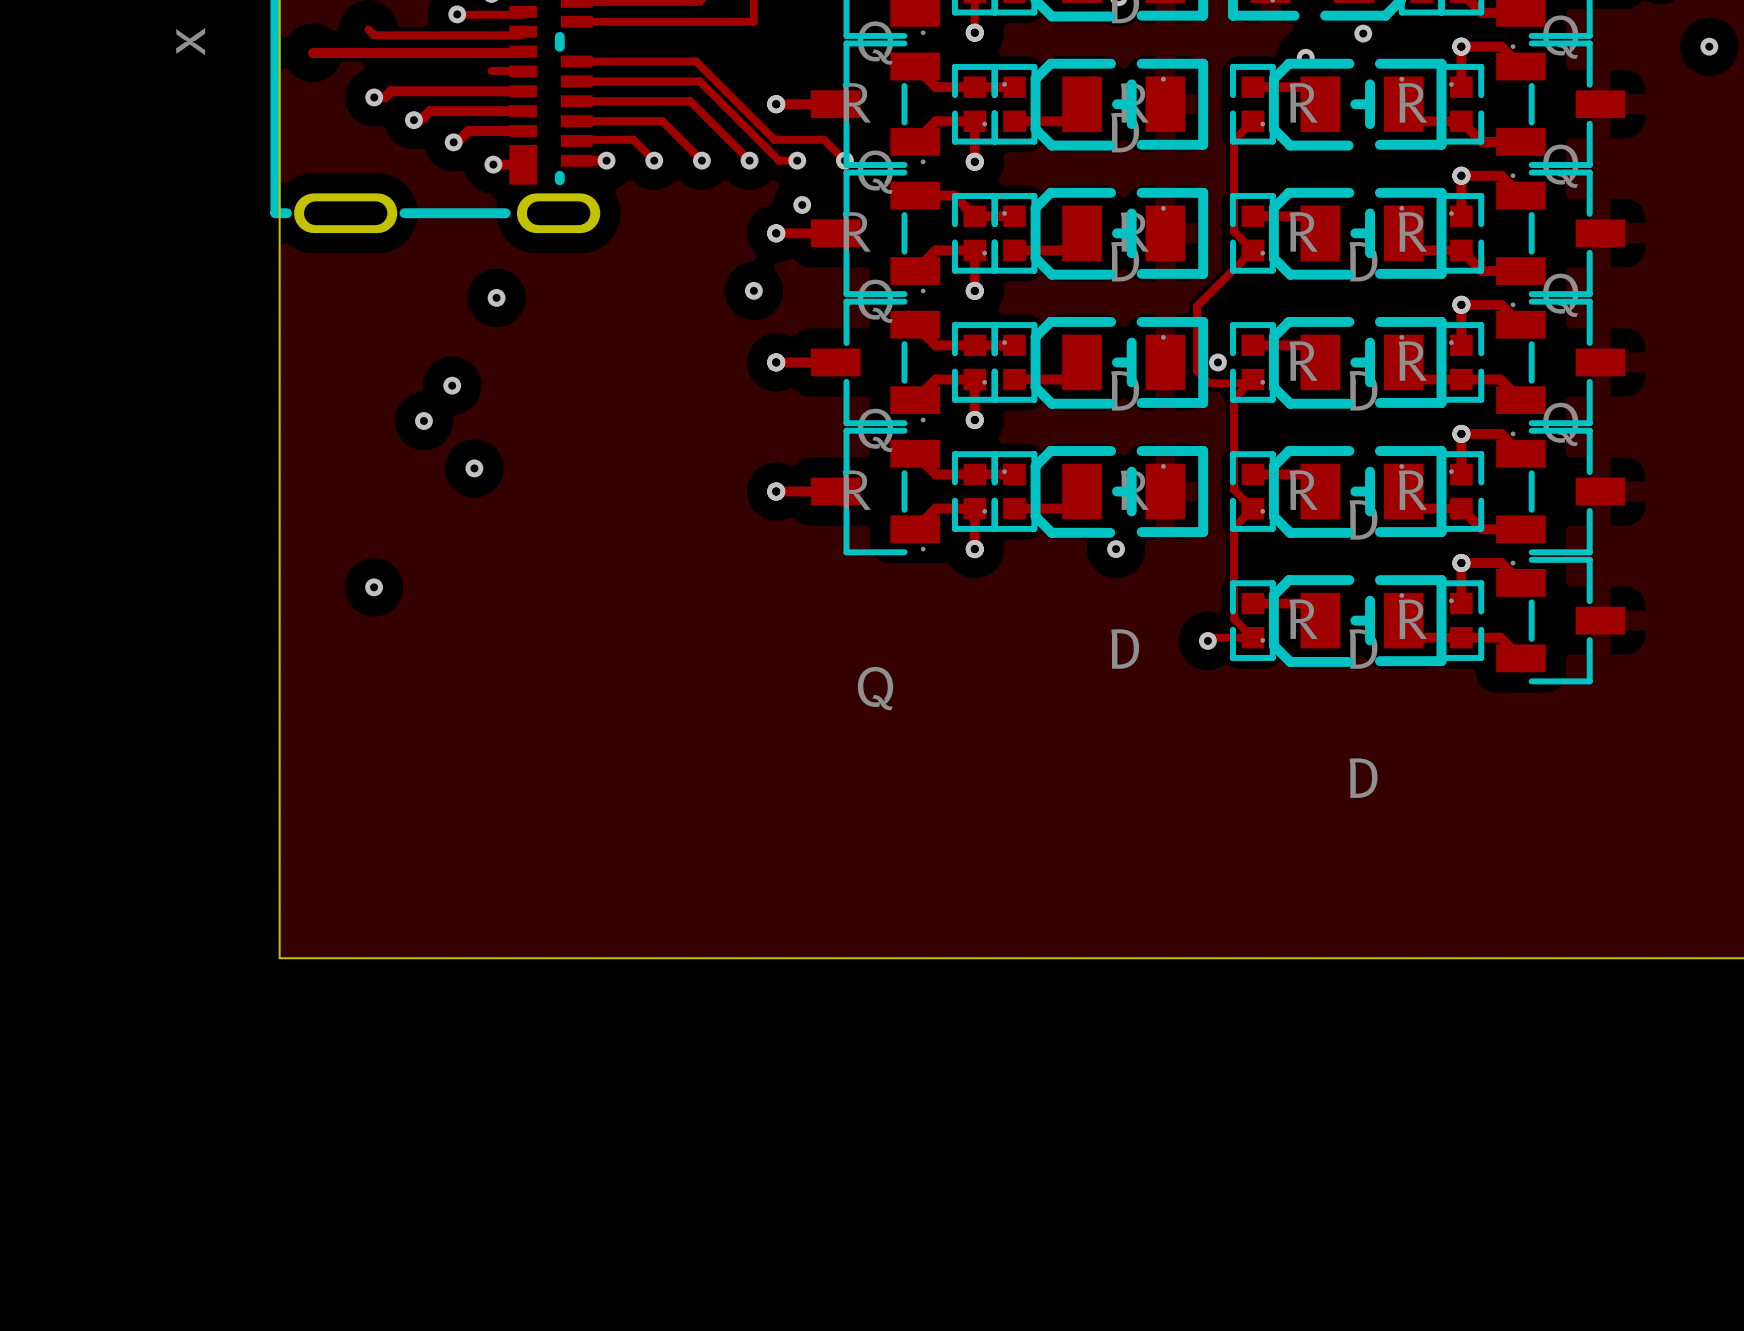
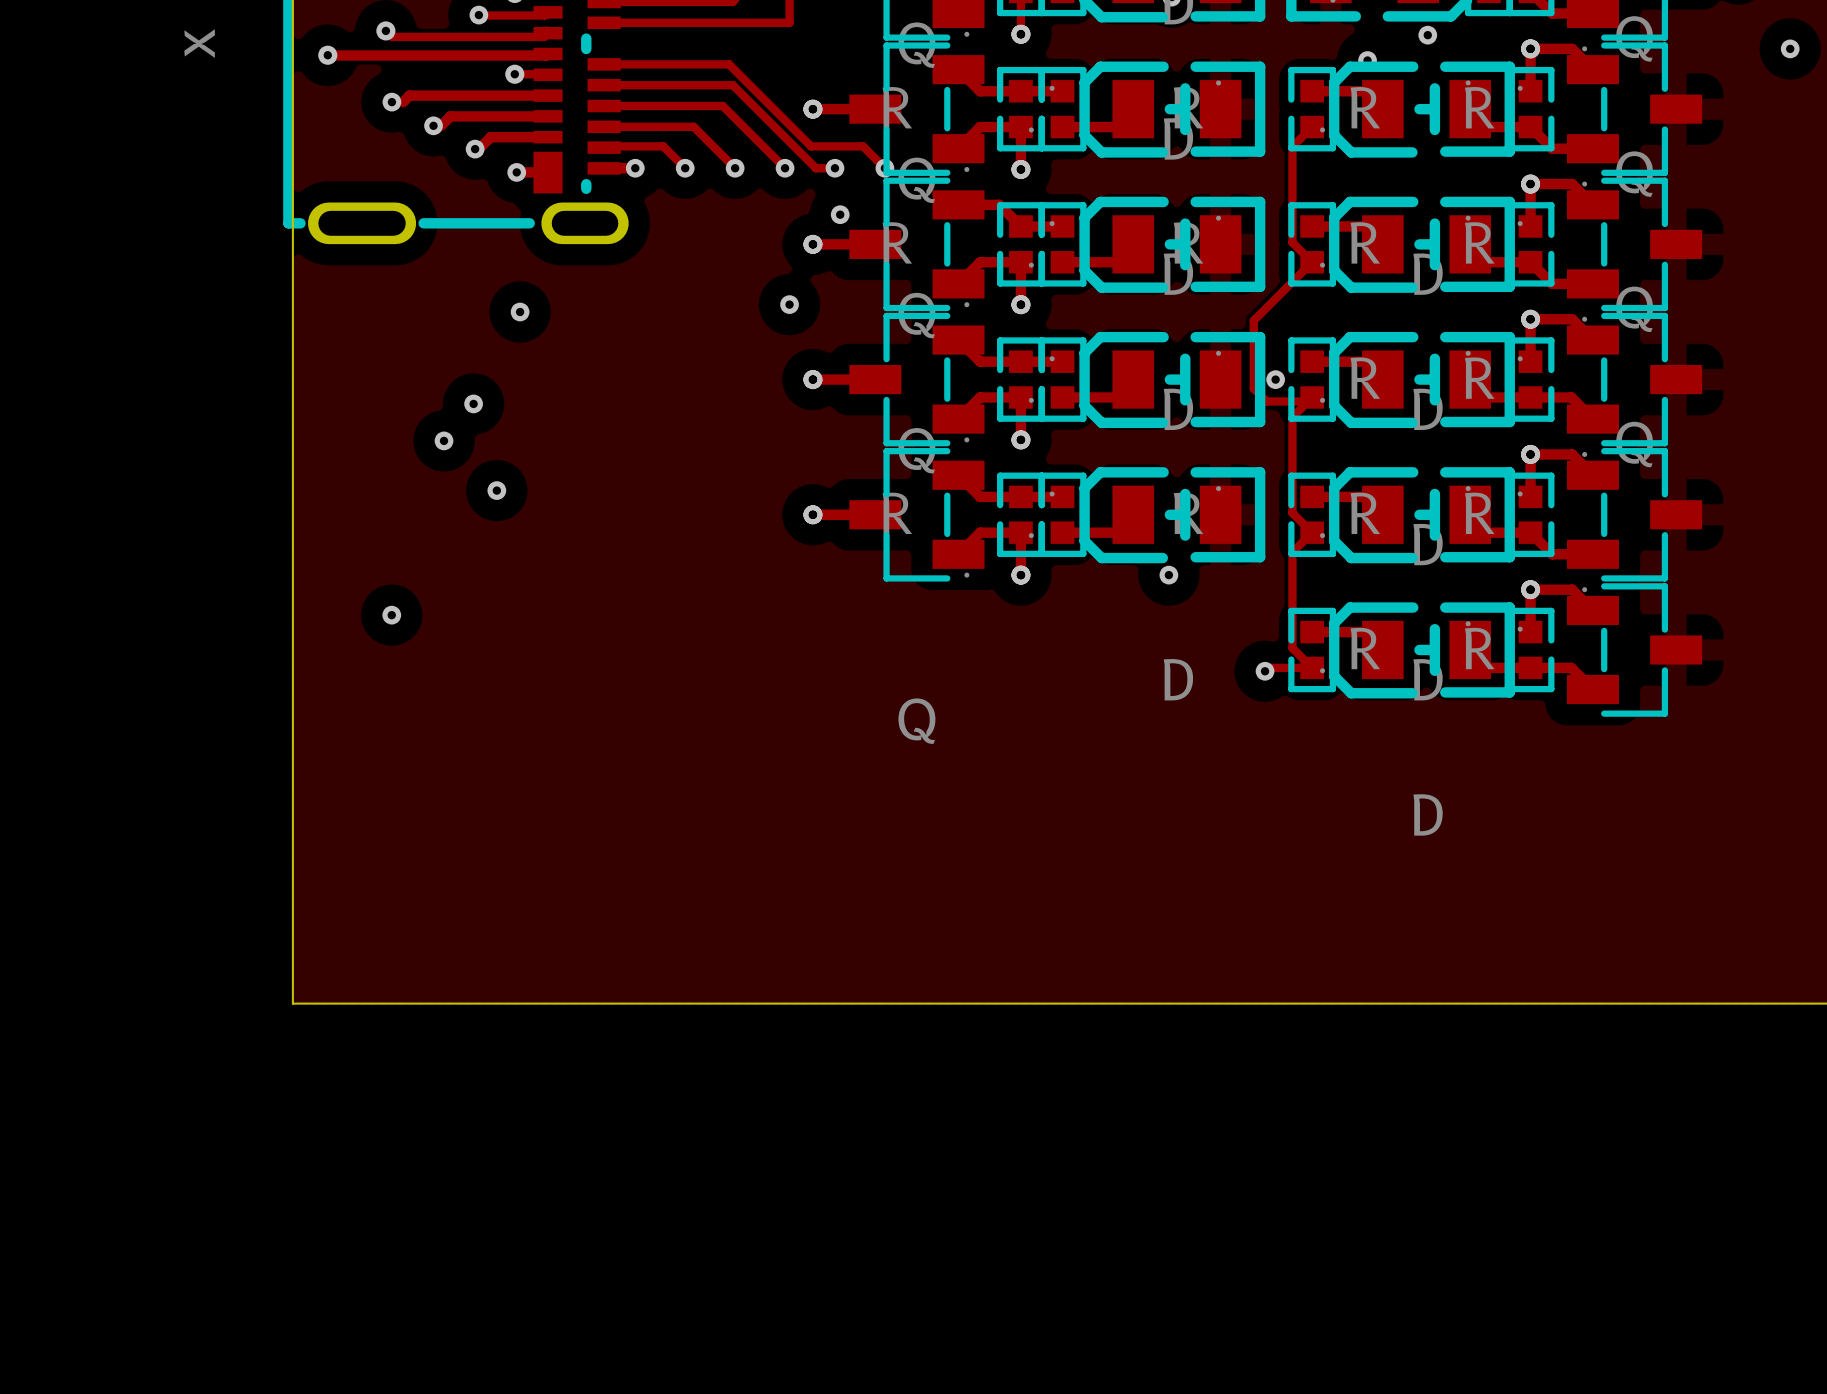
via: none -> (385, 30)
via: none -> (327, 55)
via: none -> (514, 74)

